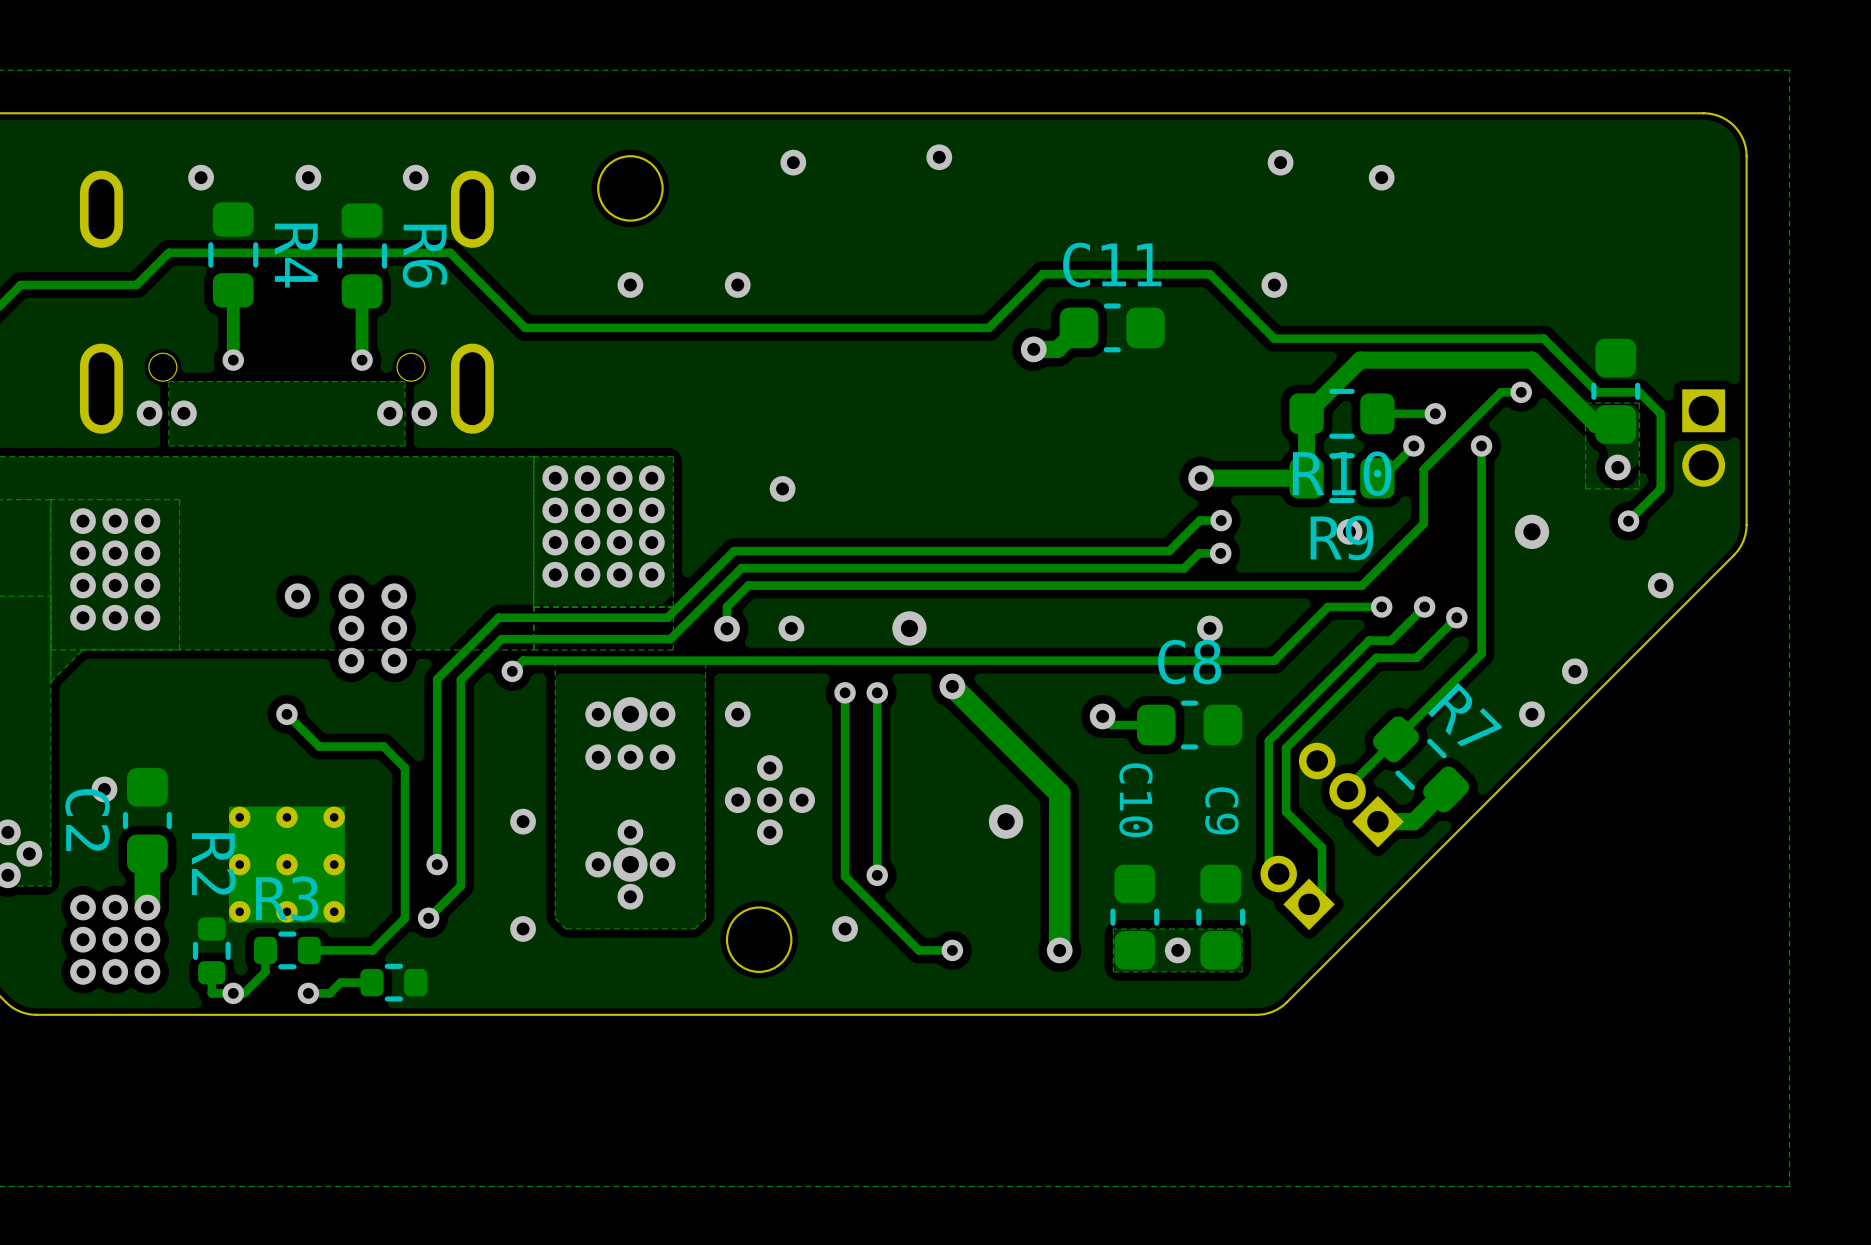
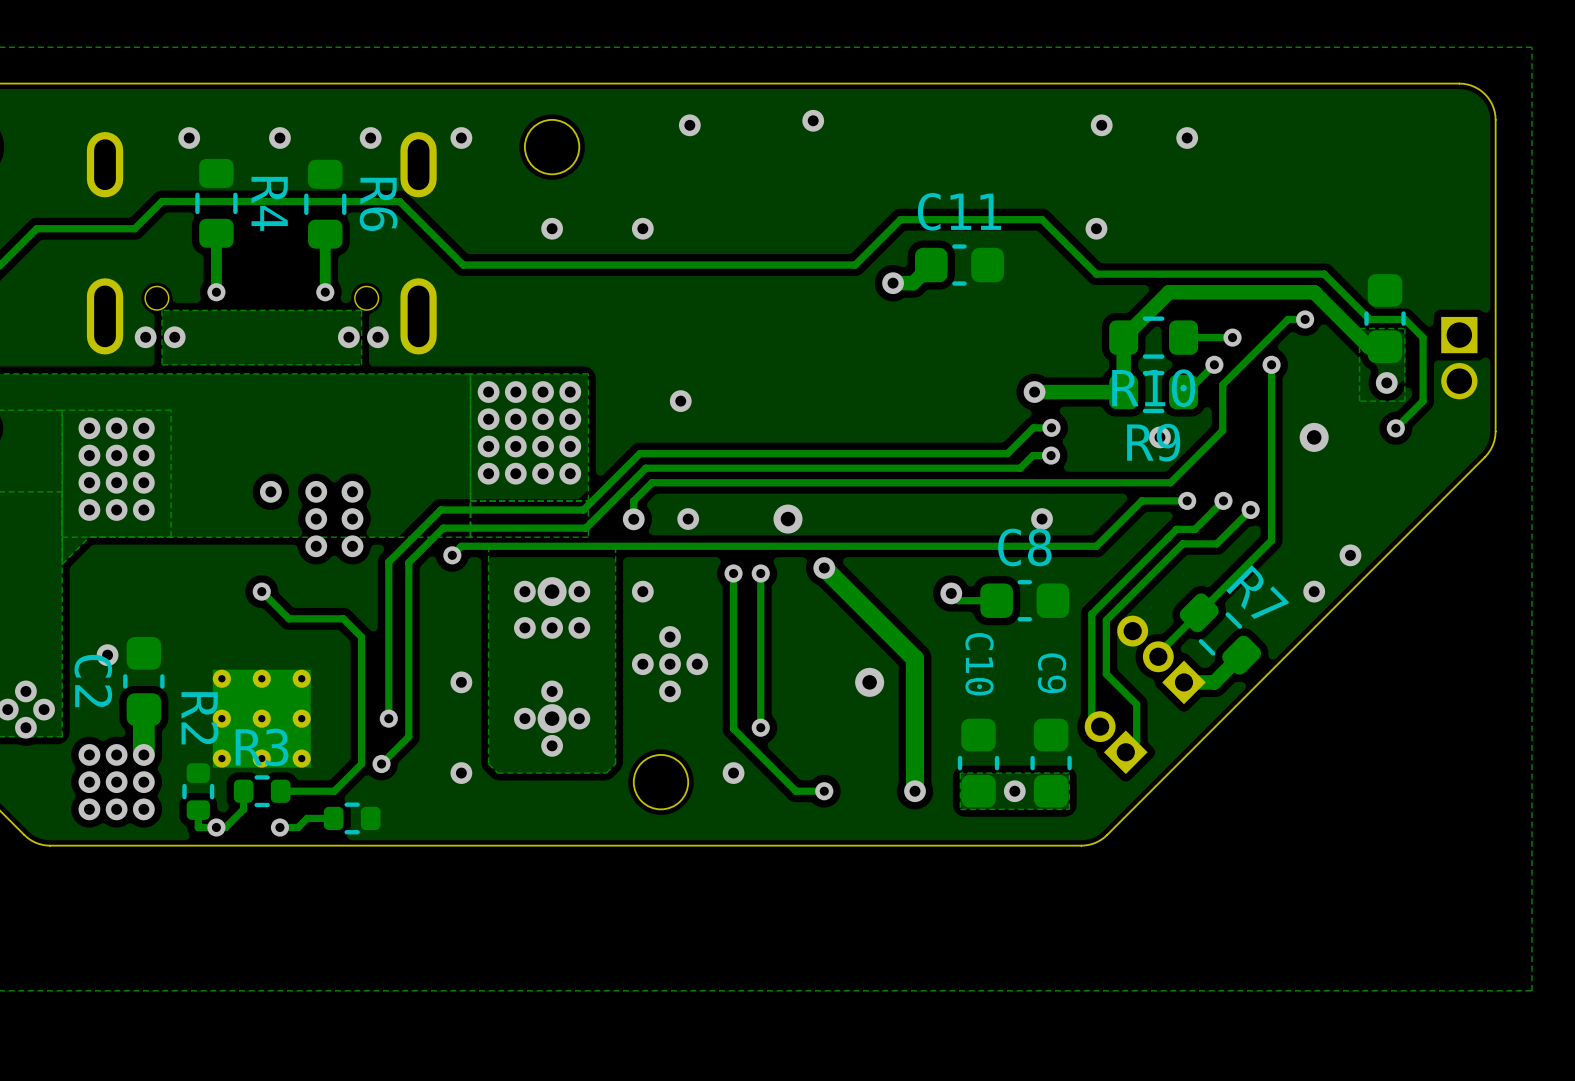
via: (1660, 585) -> none

